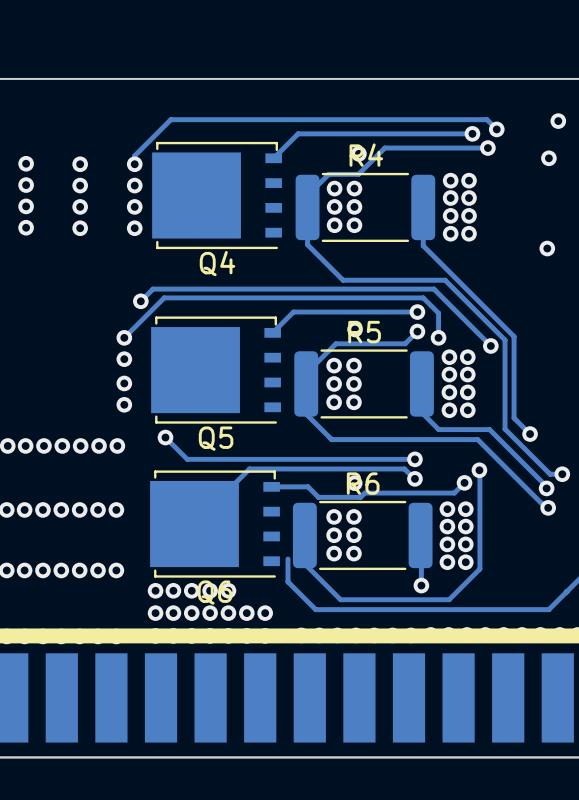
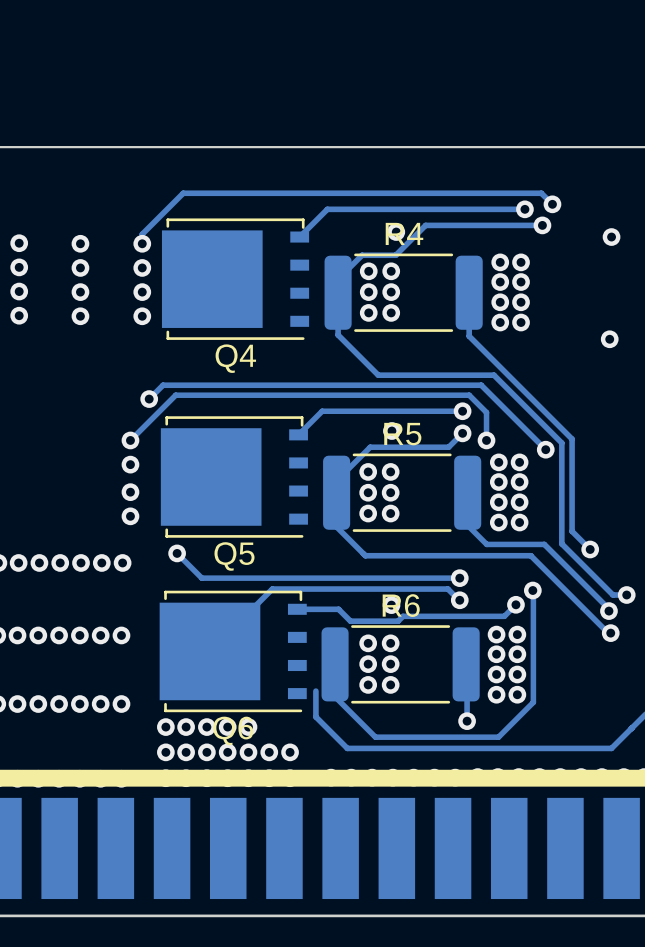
via: (558, 121) -> none

